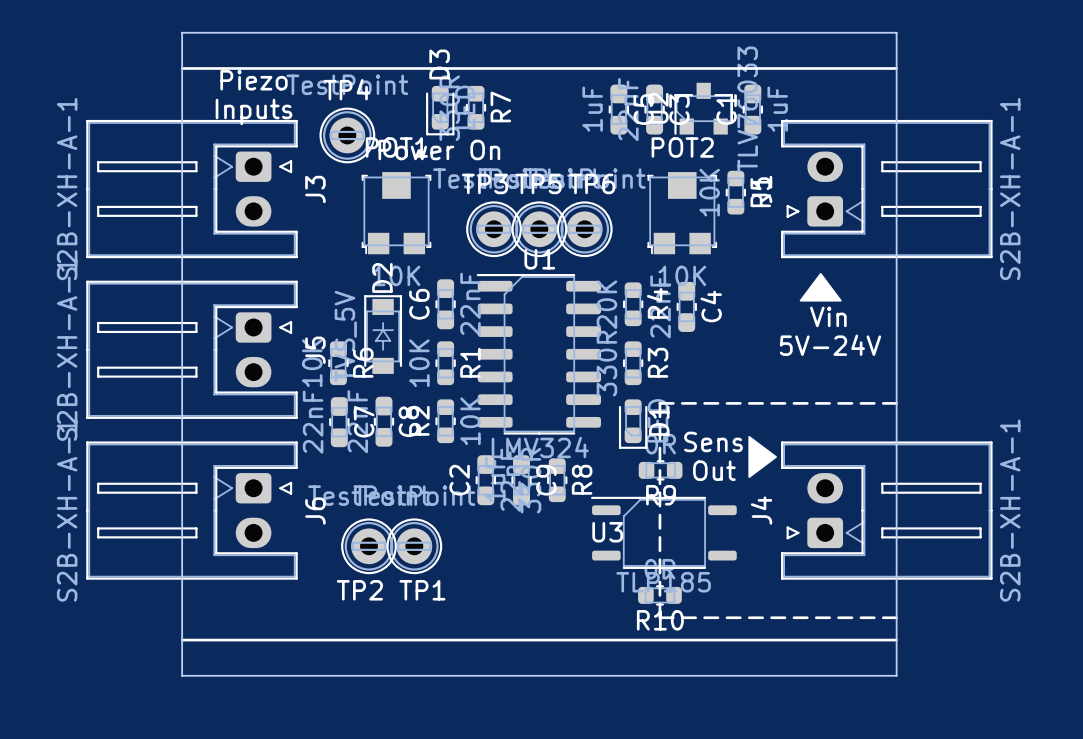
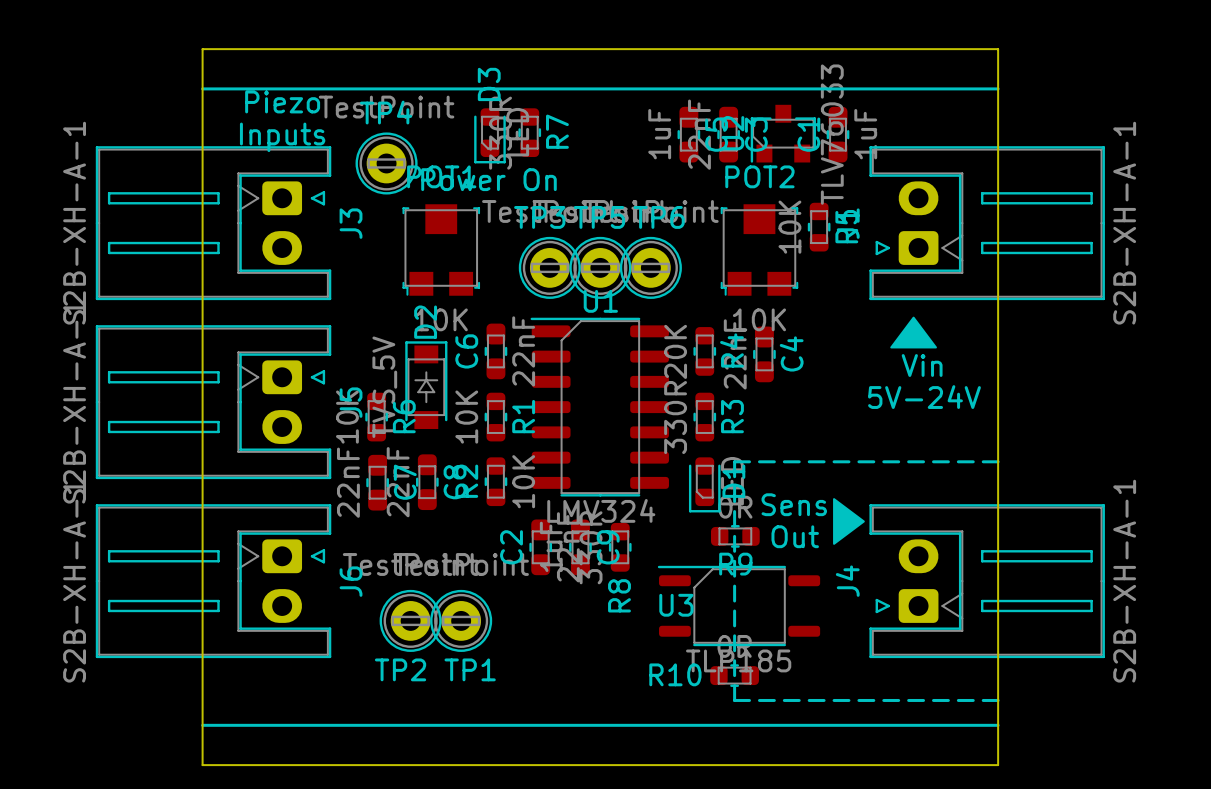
R8 name position: R8 (582, 479) -> R8 (619, 595)
R10 name position: R10 (660, 620) -> R10 (675, 674)

